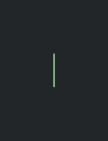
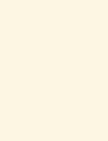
wire: (54, 54) (54, 86) -> none

